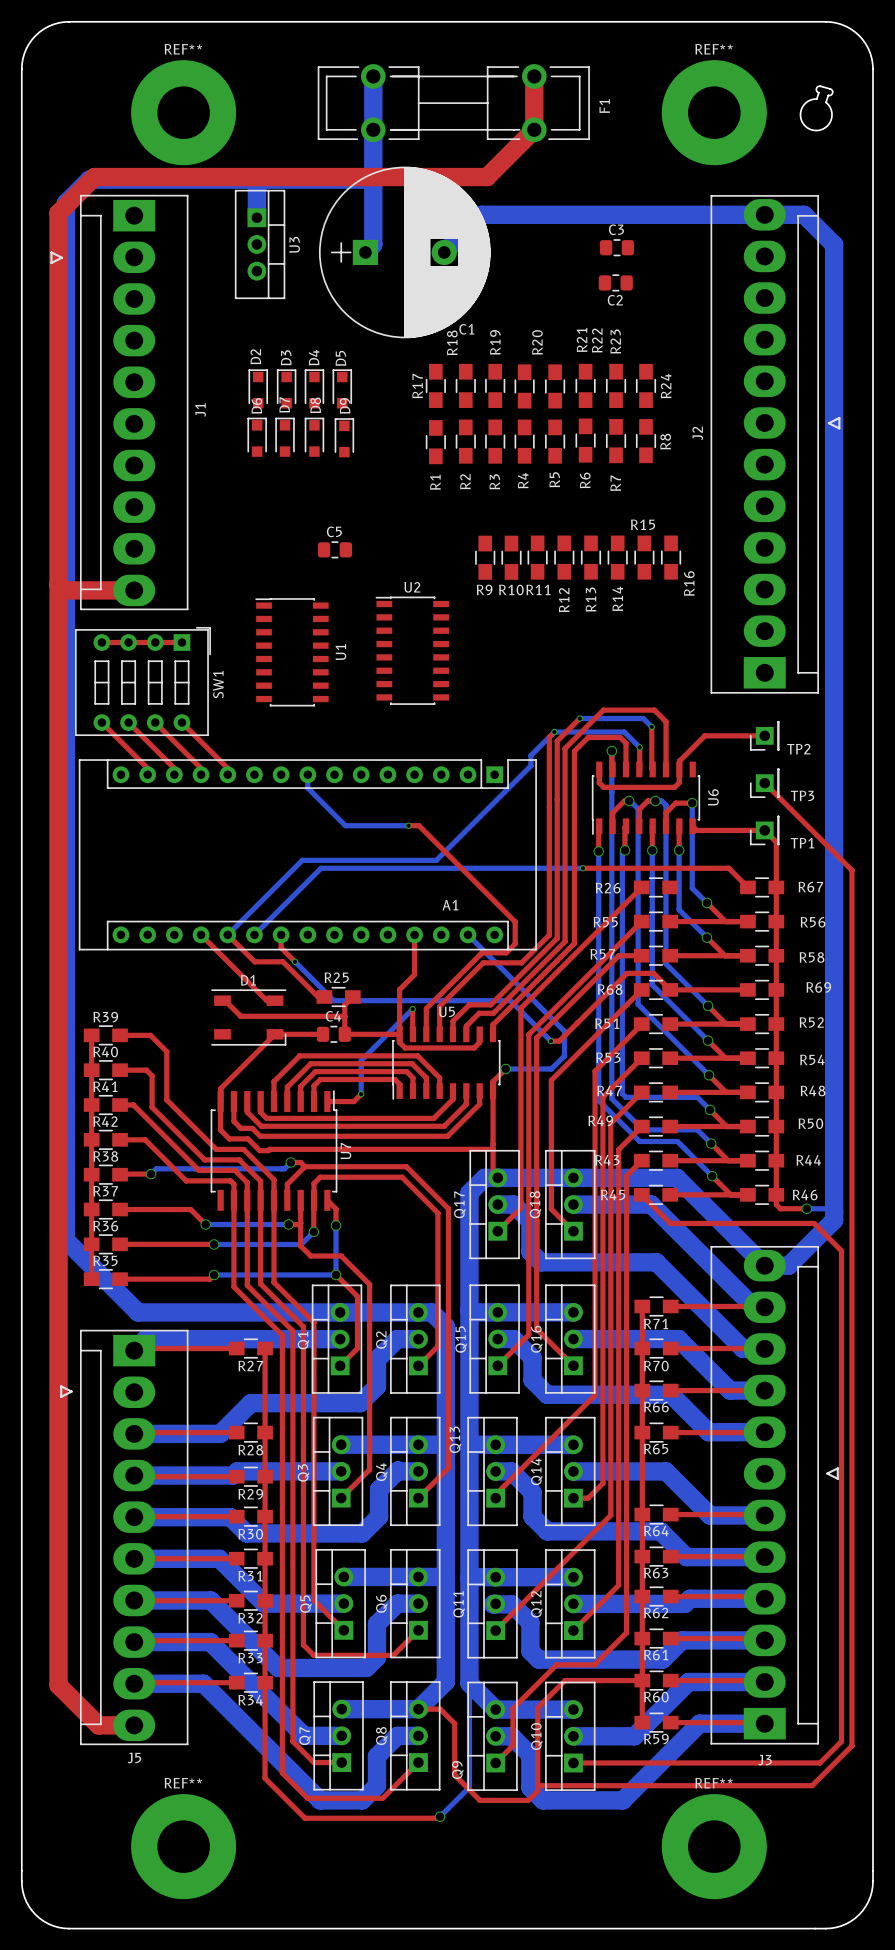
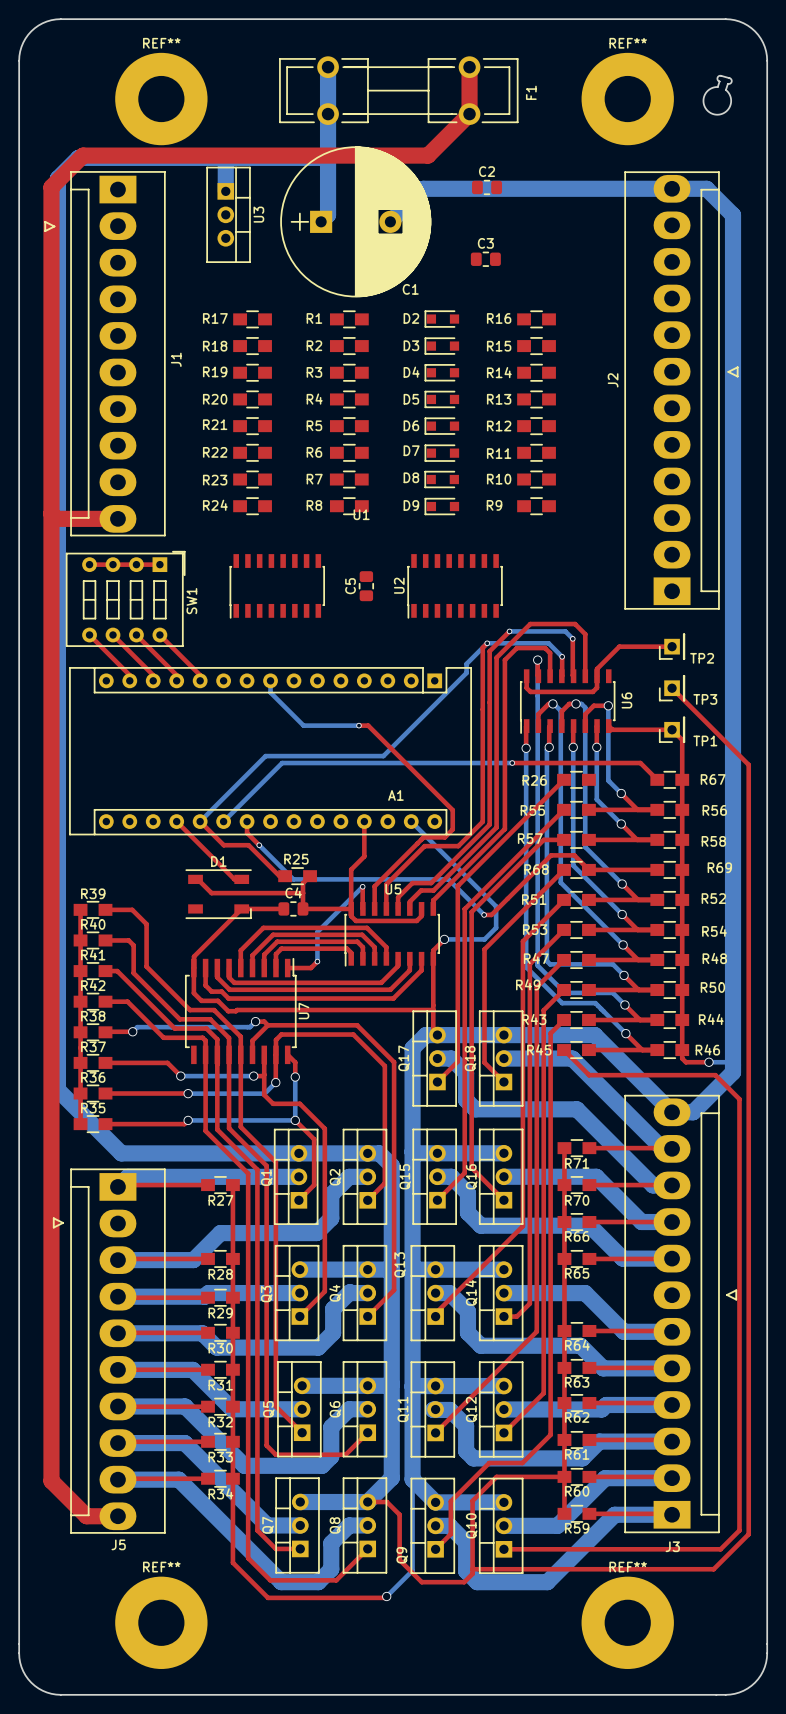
C3 position: (616, 247) -> (485, 259)
C2 position: (615, 282) -> (487, 187)
C2 name position: C2 (615, 300) -> C2 (487, 171)
R21 name position: R21 (582, 340) -> R21 (215, 424)
R22 name position: R22 (597, 340) -> R22 (215, 452)
R23 name position: R23 (615, 341) -> R23 (215, 480)
R18 name position: R18 (452, 342) -> R18 (215, 346)
R19 name position: R19 (495, 342) -> R19 (215, 371)
R20 name position: R20 (537, 342) -> R20 (215, 399)
R17 rotation: 0° (435, 385) -> 90° clockwise (252, 319)
R17 position: (435, 385) -> (252, 319)
R18 rotation: 0° (465, 385) -> 90° clockwise (252, 346)
R18 position: (465, 385) -> (252, 346)
R19 rotation: 0° (495, 385) -> 90° clockwise (252, 372)
R19 position: (495, 385) -> (252, 372)
R22 rotation: 0° (585, 385) -> 90° clockwise (252, 452)
R22 position: (585, 385) -> (252, 452)
R23 rotation: 0° (616, 385) -> 90° clockwise (252, 479)
R23 position: (616, 385) -> (252, 479)
R24 rotation: 0° (646, 385) -> 90° clockwise (252, 506)
R24 position: (646, 385) -> (252, 506)
R17 name position: R17 (417, 386) -> R17 (215, 318)
R20 rotation: 0° (524, 386) -> 90° clockwise (252, 399)
R20 position: (524, 386) -> (252, 399)
R21 rotation: 0° (555, 386) -> 90° clockwise (252, 426)
R21 position: (555, 386) -> (252, 426)
R24 name position: R24 (666, 386) -> R24 (215, 505)
D2 rotation: 0° (258, 389) -> 90° counterclockwise (441, 319)
D2 position: (258, 389) -> (441, 319)
D3 rotation: 0° (286, 389) -> 90° counterclockwise (441, 346)
D3 position: (286, 389) -> (441, 346)
D4 rotation: 0° (314, 389) -> 90° counterclockwise (441, 372)
D4 position: (314, 389) -> (441, 372)
D5 rotation: 0° (342, 389) -> 90° counterclockwise (441, 399)
D5 position: (342, 389) -> (441, 399)
D6 rotation: 0° (257, 437) -> 90° counterclockwise (441, 426)
D6 position: (257, 437) -> (441, 426)
D7 rotation: 0° (285, 437) -> 90° counterclockwise (441, 453)
D7 position: (285, 437) -> (441, 453)
D8 rotation: 0° (314, 437) -> 90° counterclockwise (441, 479)
D8 position: (314, 437) -> (441, 479)
D9 rotation: 0° (344, 437) -> 90° counterclockwise (441, 506)
D9 position: (344, 437) -> (441, 506)
R6 rotation: 0° (585, 440) -> 90° clockwise (349, 452)
R6 position: (585, 440) -> (349, 452)
R2 rotation: 0° (465, 441) -> 90° clockwise (349, 346)
R2 position: (465, 441) -> (349, 346)
R3 rotation: 0° (495, 441) -> 90° clockwise (349, 372)
R3 position: (495, 441) -> (349, 372)
R4 rotation: 0° (524, 441) -> 90° clockwise (349, 399)
R4 position: (524, 441) -> (349, 399)
R5 rotation: 0° (555, 441) -> 90° clockwise (349, 426)
R5 position: (555, 441) -> (349, 426)
R7 rotation: 0° (616, 441) -> 90° clockwise (349, 479)
R7 position: (616, 441) -> (349, 479)
R8 rotation: 0° (646, 441) -> 90° clockwise (349, 506)
R8 position: (646, 441) -> (349, 506)
R8 name position: R8 (665, 441) -> R8 (314, 505)
R1 rotation: 0° (435, 442) -> 90° clockwise (349, 319)
R1 position: (435, 442) -> (349, 319)
R15 name position: R15 (643, 524) -> R15 (499, 346)
C5 name position: C5 (334, 531) -> C5 (350, 586)
C5 rotation: 0° (334, 549) -> 90° clockwise (366, 586)
C5 position: (334, 549) -> (366, 586)
R9 rotation: 0° (485, 557) -> 90° clockwise (536, 506)
R9 position: (485, 557) -> (536, 506)
R10 rotation: 0° (511, 557) -> 90° clockwise (536, 479)
R10 position: (511, 557) -> (536, 479)
R11 rotation: 0° (537, 557) -> 90° clockwise (536, 452)
R11 position: (537, 557) -> (536, 452)
R12 rotation: 0° (564, 557) -> 90° clockwise (536, 426)
R12 position: (564, 557) -> (536, 426)
R13 rotation: 0° (590, 557) -> 90° clockwise (536, 399)
R13 position: (590, 557) -> (536, 399)
R14 rotation: 0° (617, 557) -> 90° clockwise (536, 372)
R14 position: (617, 557) -> (536, 372)
R15 rotation: 0° (644, 557) -> 90° clockwise (536, 346)
R15 position: (644, 557) -> (536, 346)
R16 rotation: 0° (671, 557) -> 90° clockwise (536, 319)
R16 position: (671, 557) -> (536, 319)
R16 name position: R16 (689, 583) -> R16 (499, 318)
U2 rotation: 0° (412, 650) -> 90° counterclockwise (455, 586)
U2 position: (412, 650) -> (455, 586)
U1 rotation: 0° (291, 652) -> 90° counterclockwise (277, 586)
U1 name position: U1 (340, 652) -> U1 (361, 514)

